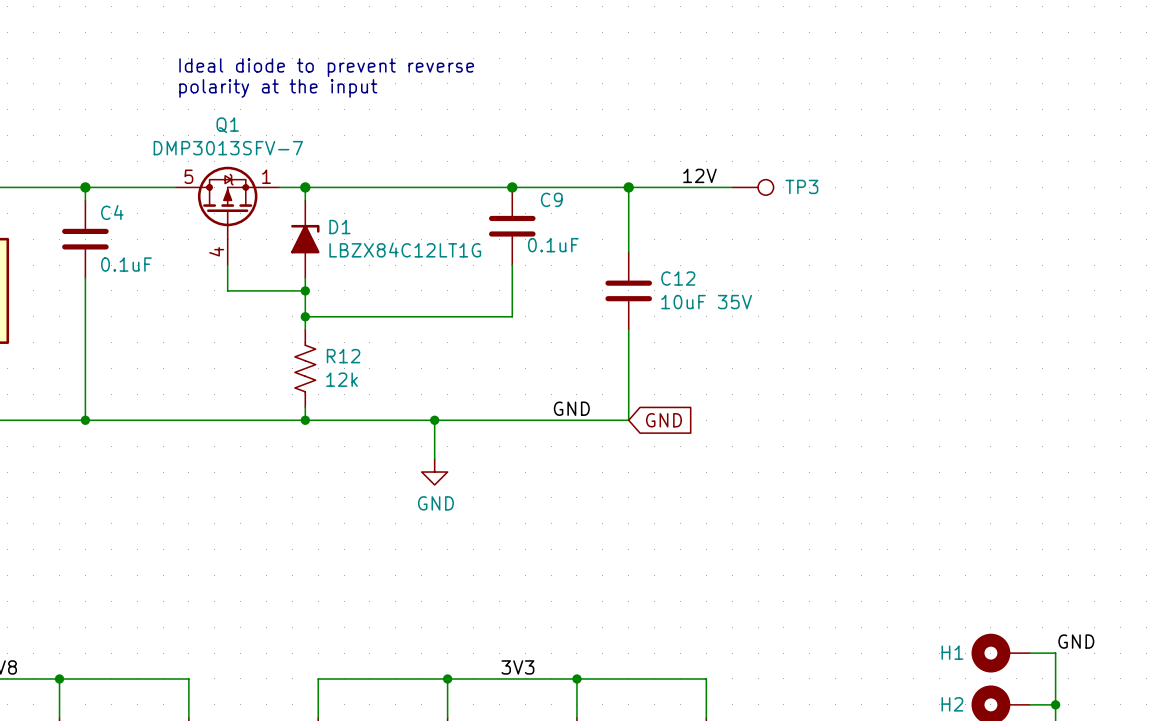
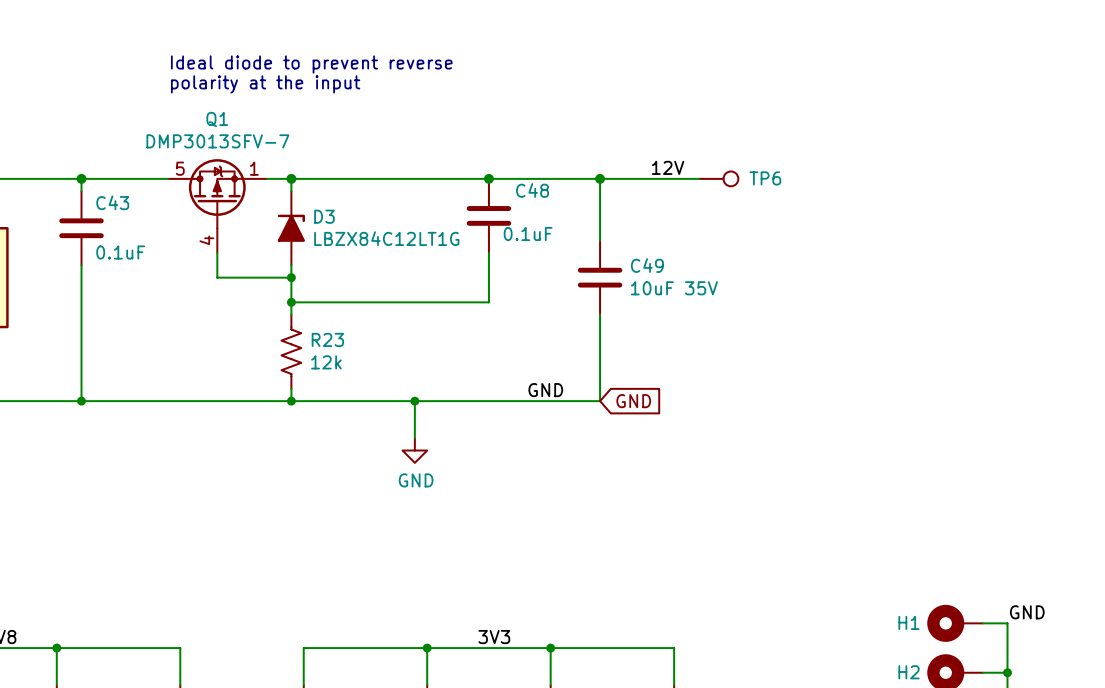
TP3 name: TP3 (801, 186) -> TP6 (765, 178)
C9 name: C9 (551, 199) -> C48 (532, 190)
C4 name: C4 (112, 212) -> C43 (112, 202)
D1 name: D1 (339, 227) -> D3 (324, 216)
C12 name: C12 (678, 278) -> C49 (647, 265)
R12 name: R12 (343, 356) -> R23 (327, 339)

